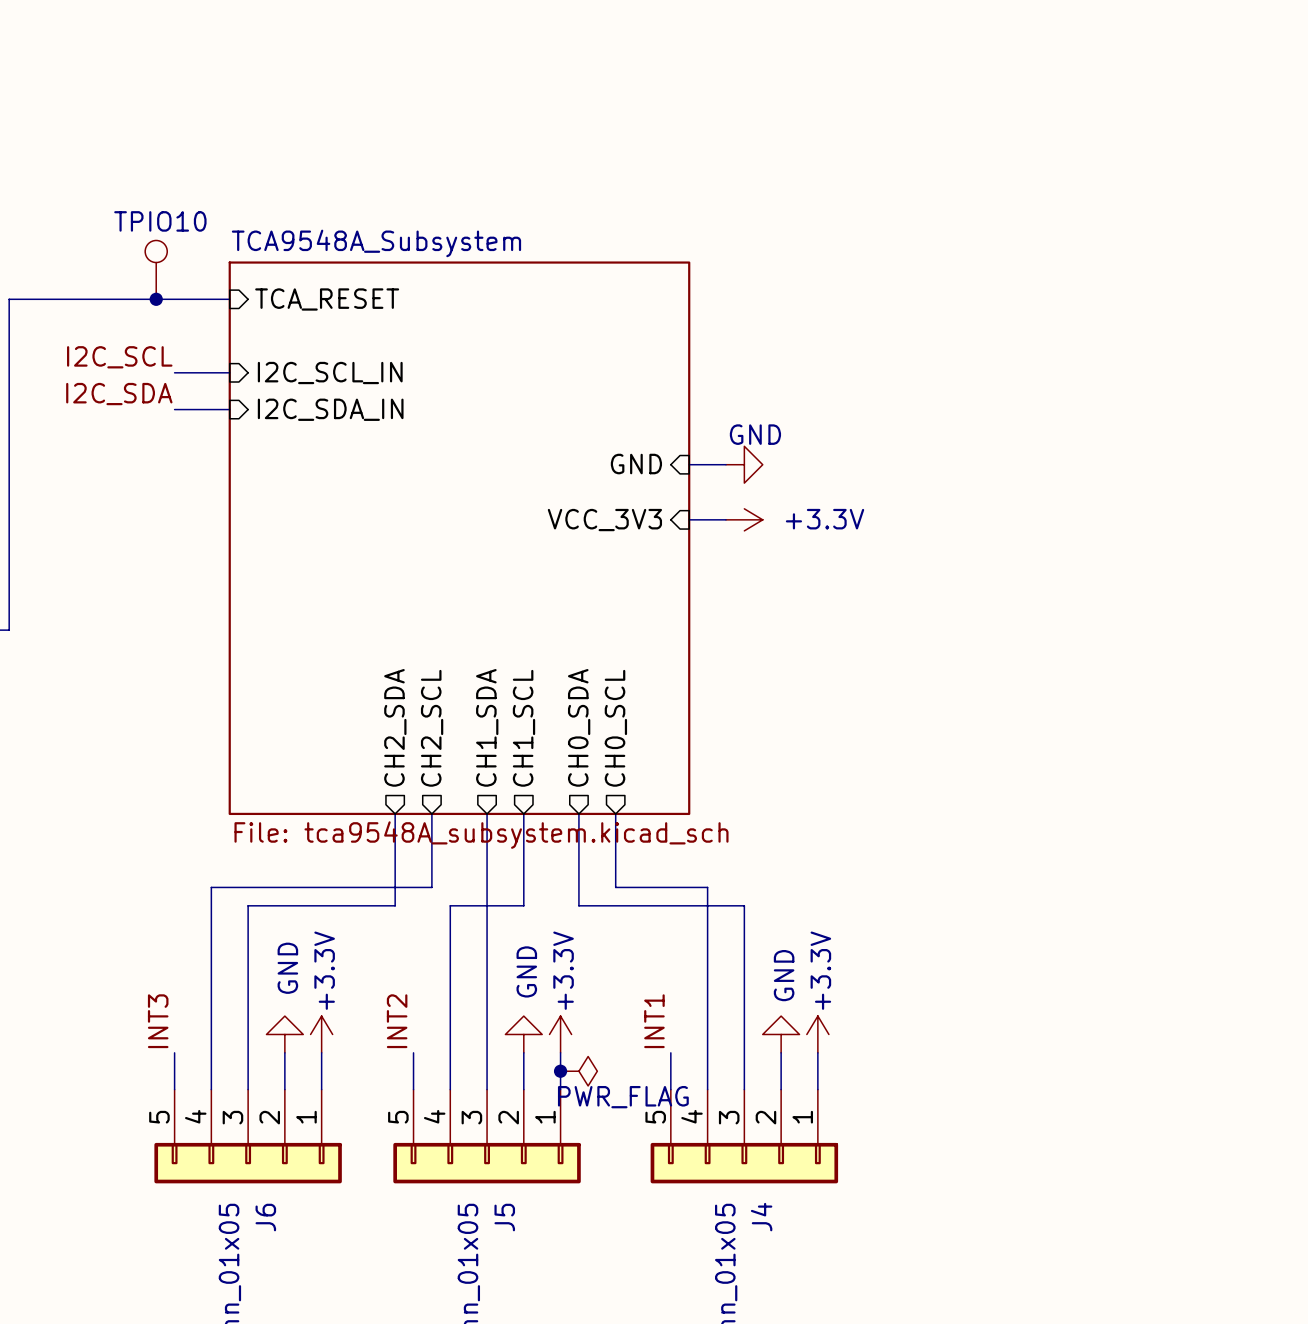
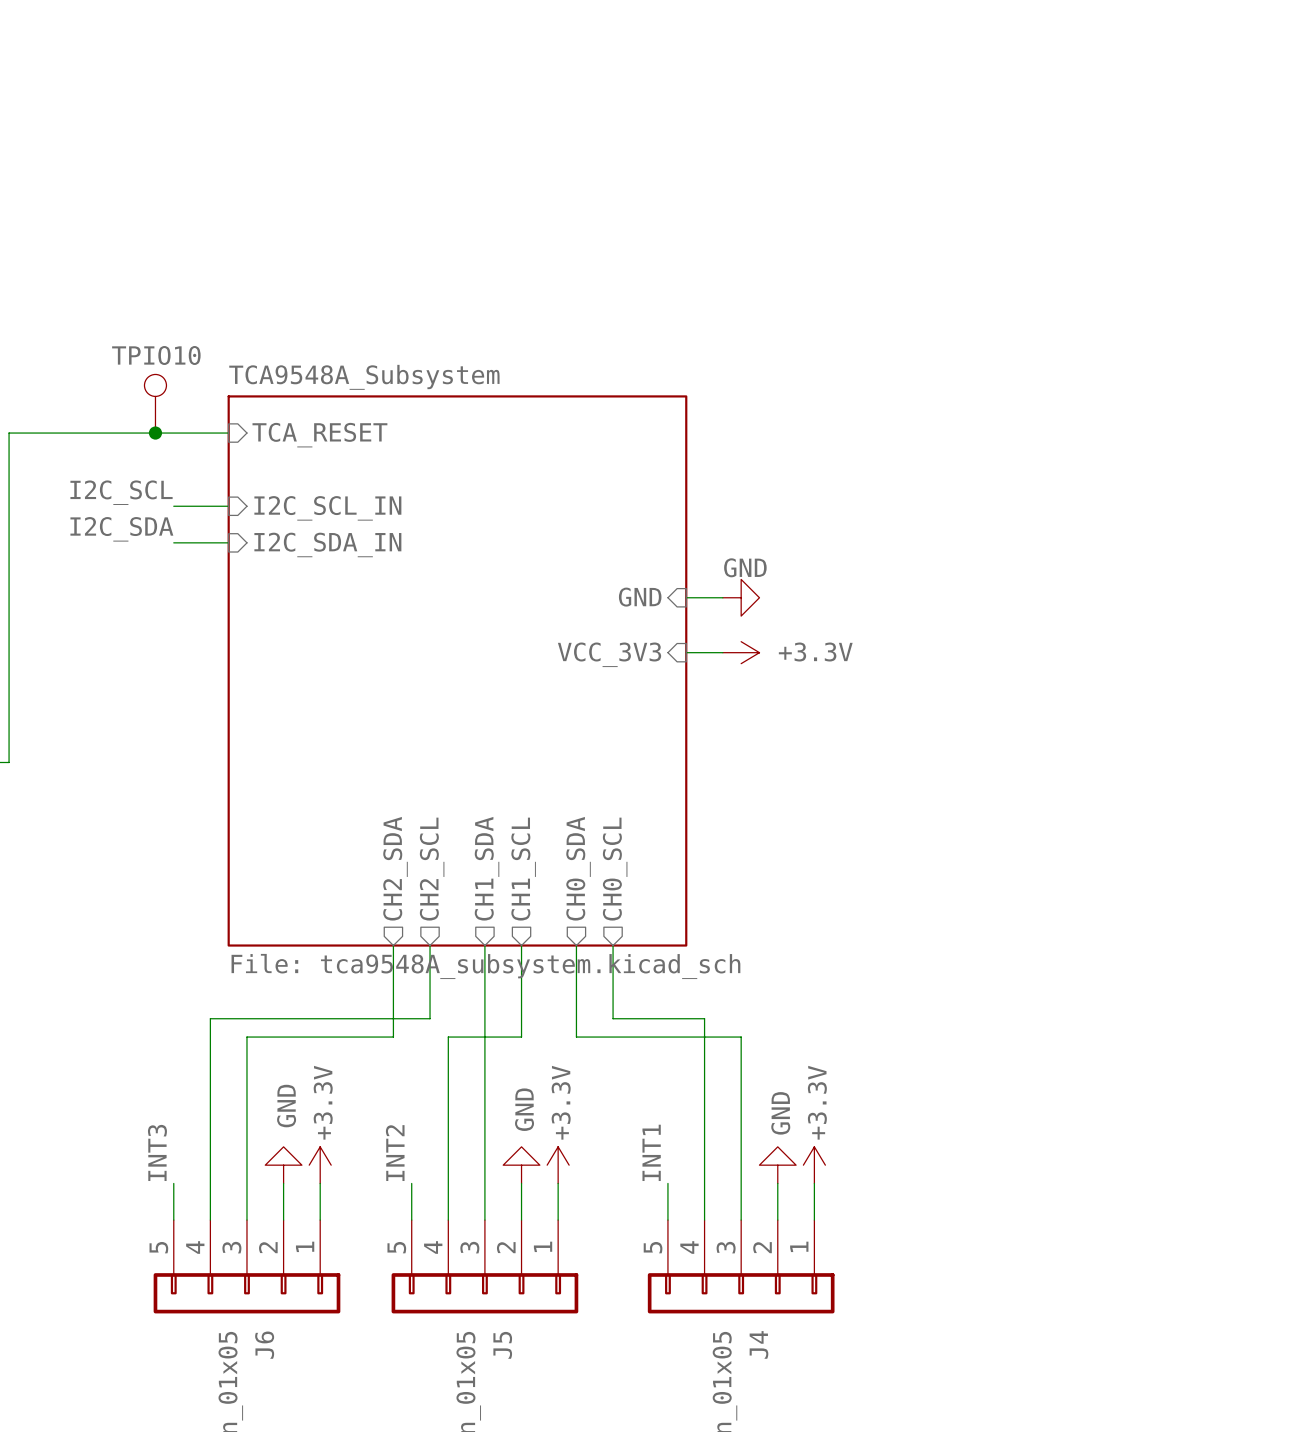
junction: (560, 1071) -> none
power symbol: PWR_FLAG (578, 1071) -> none

